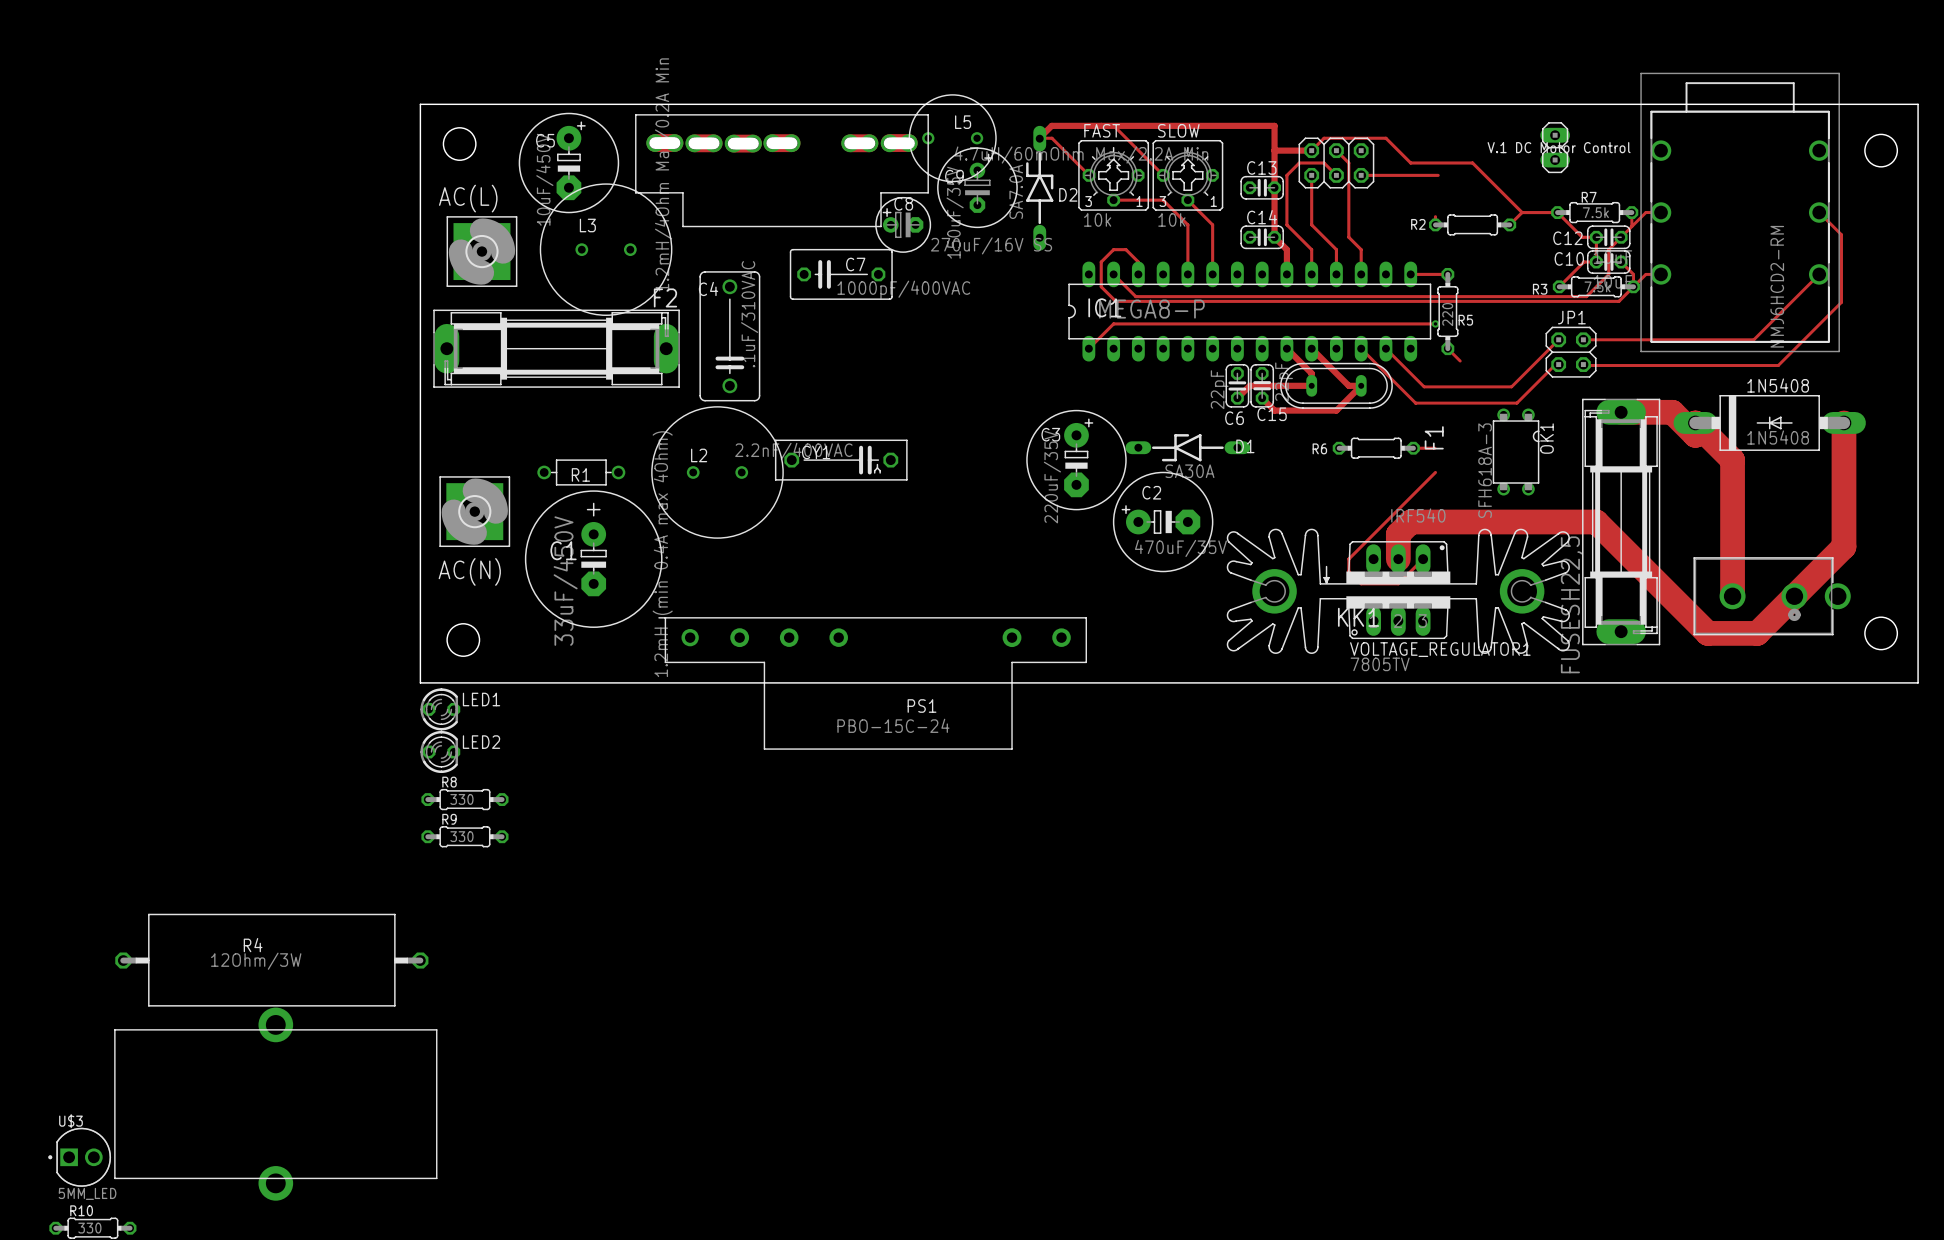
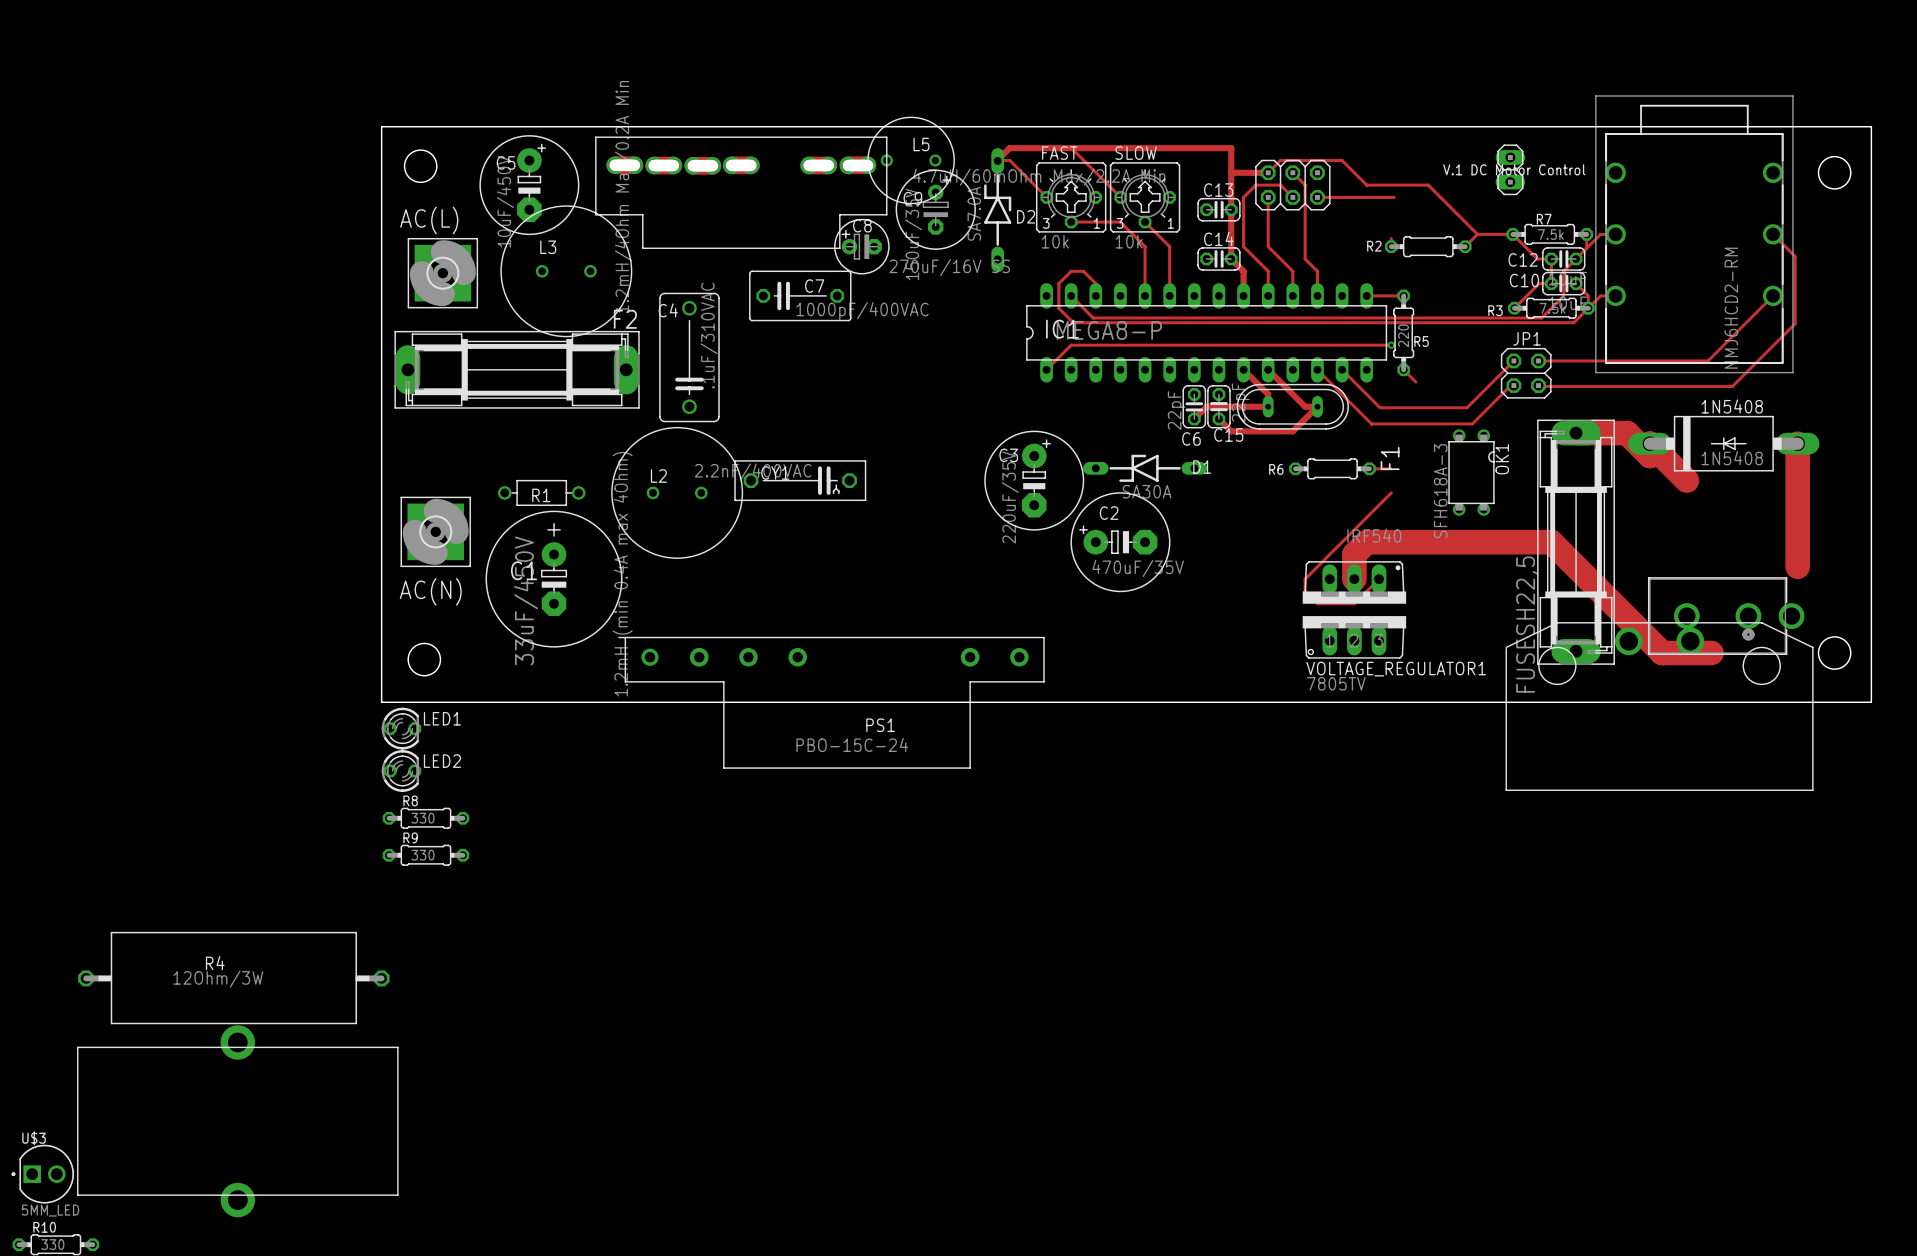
track: (1732, 460) (1732, 596) -> none
track: (1843, 546) (1757, 633) -> none
KK1: (1398, 591) -> none
part: none -> (1659, 706)

